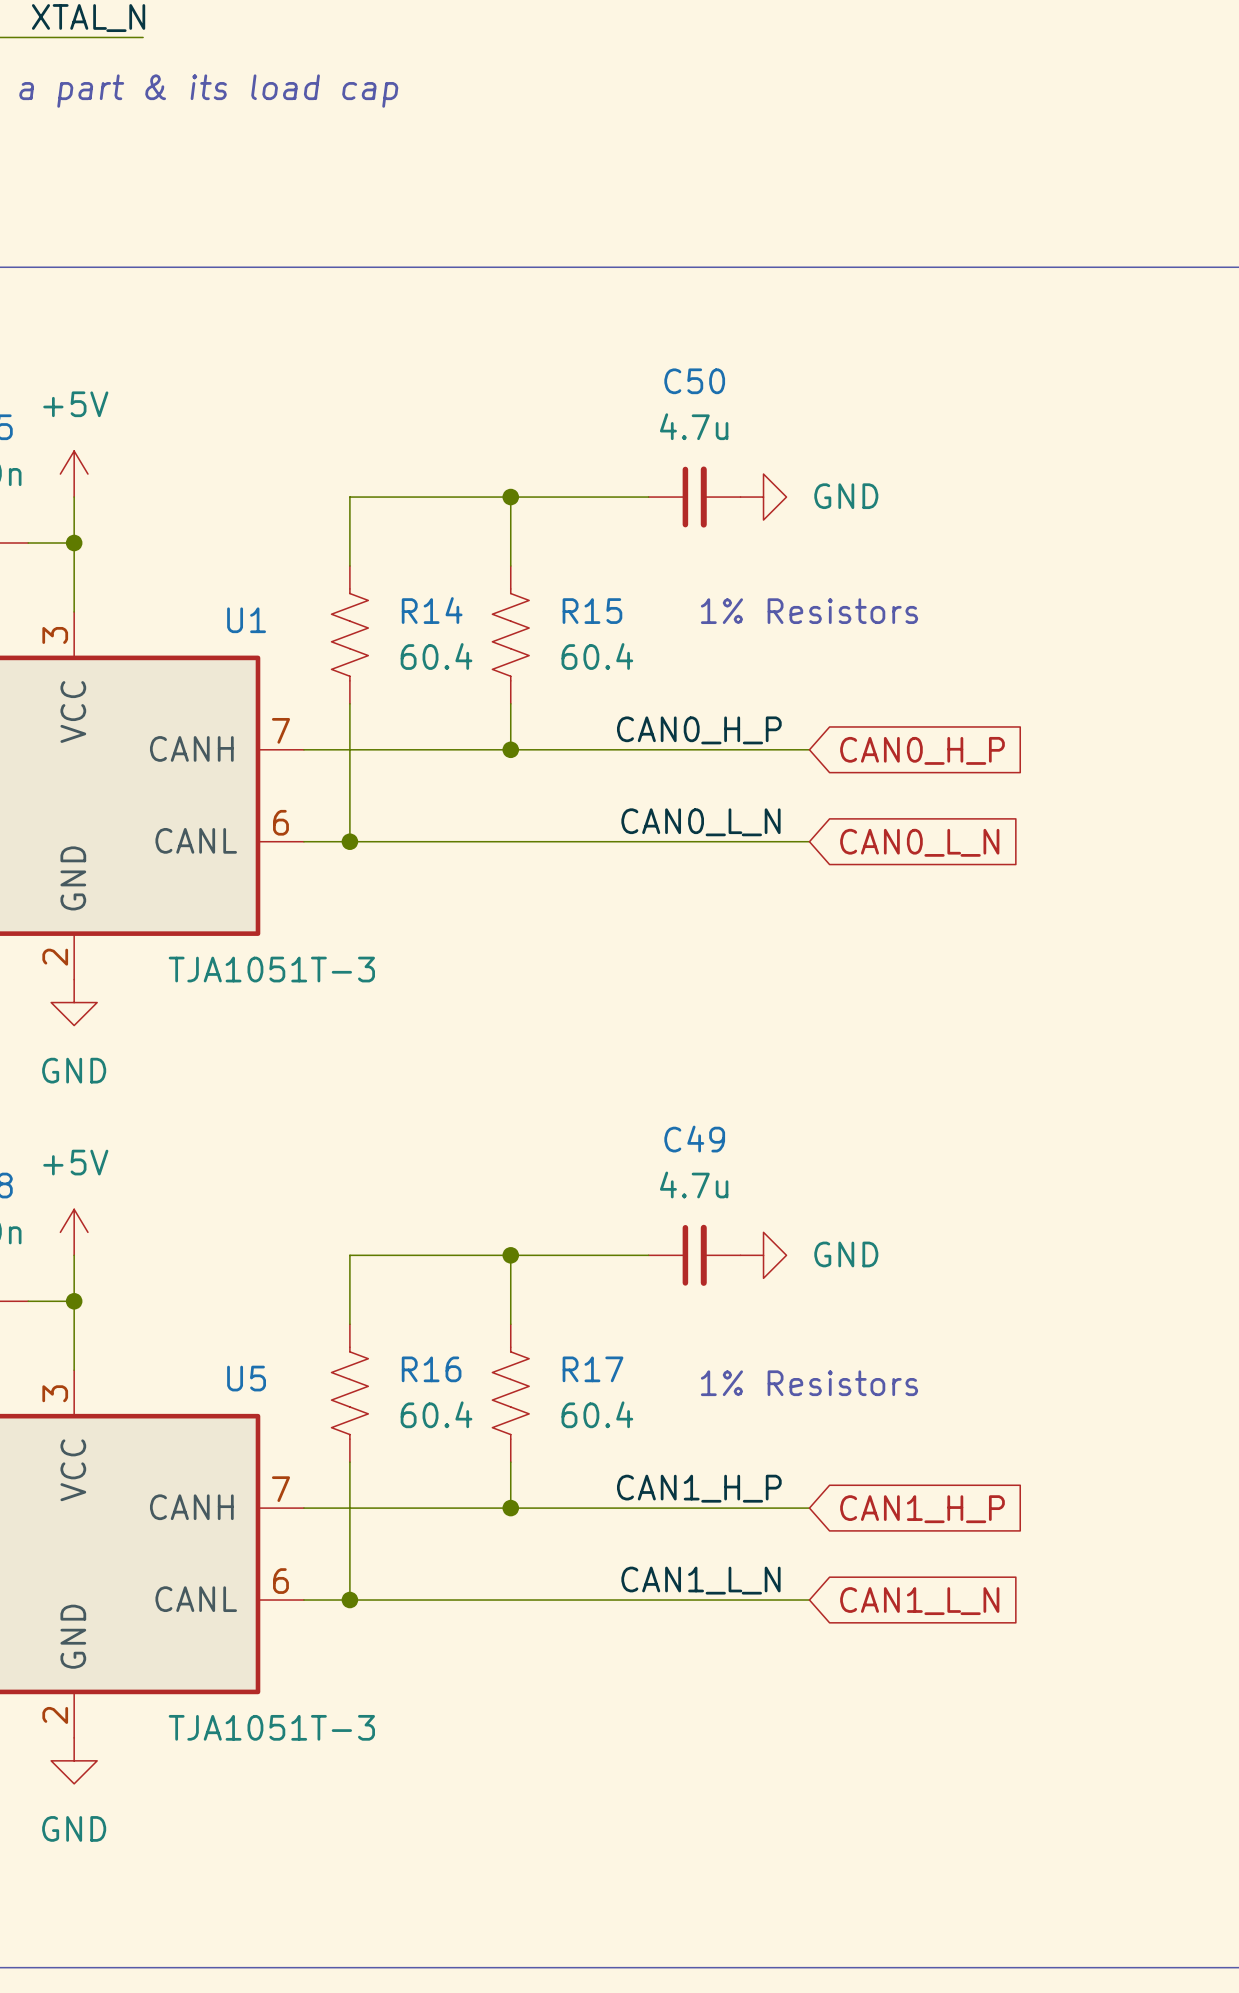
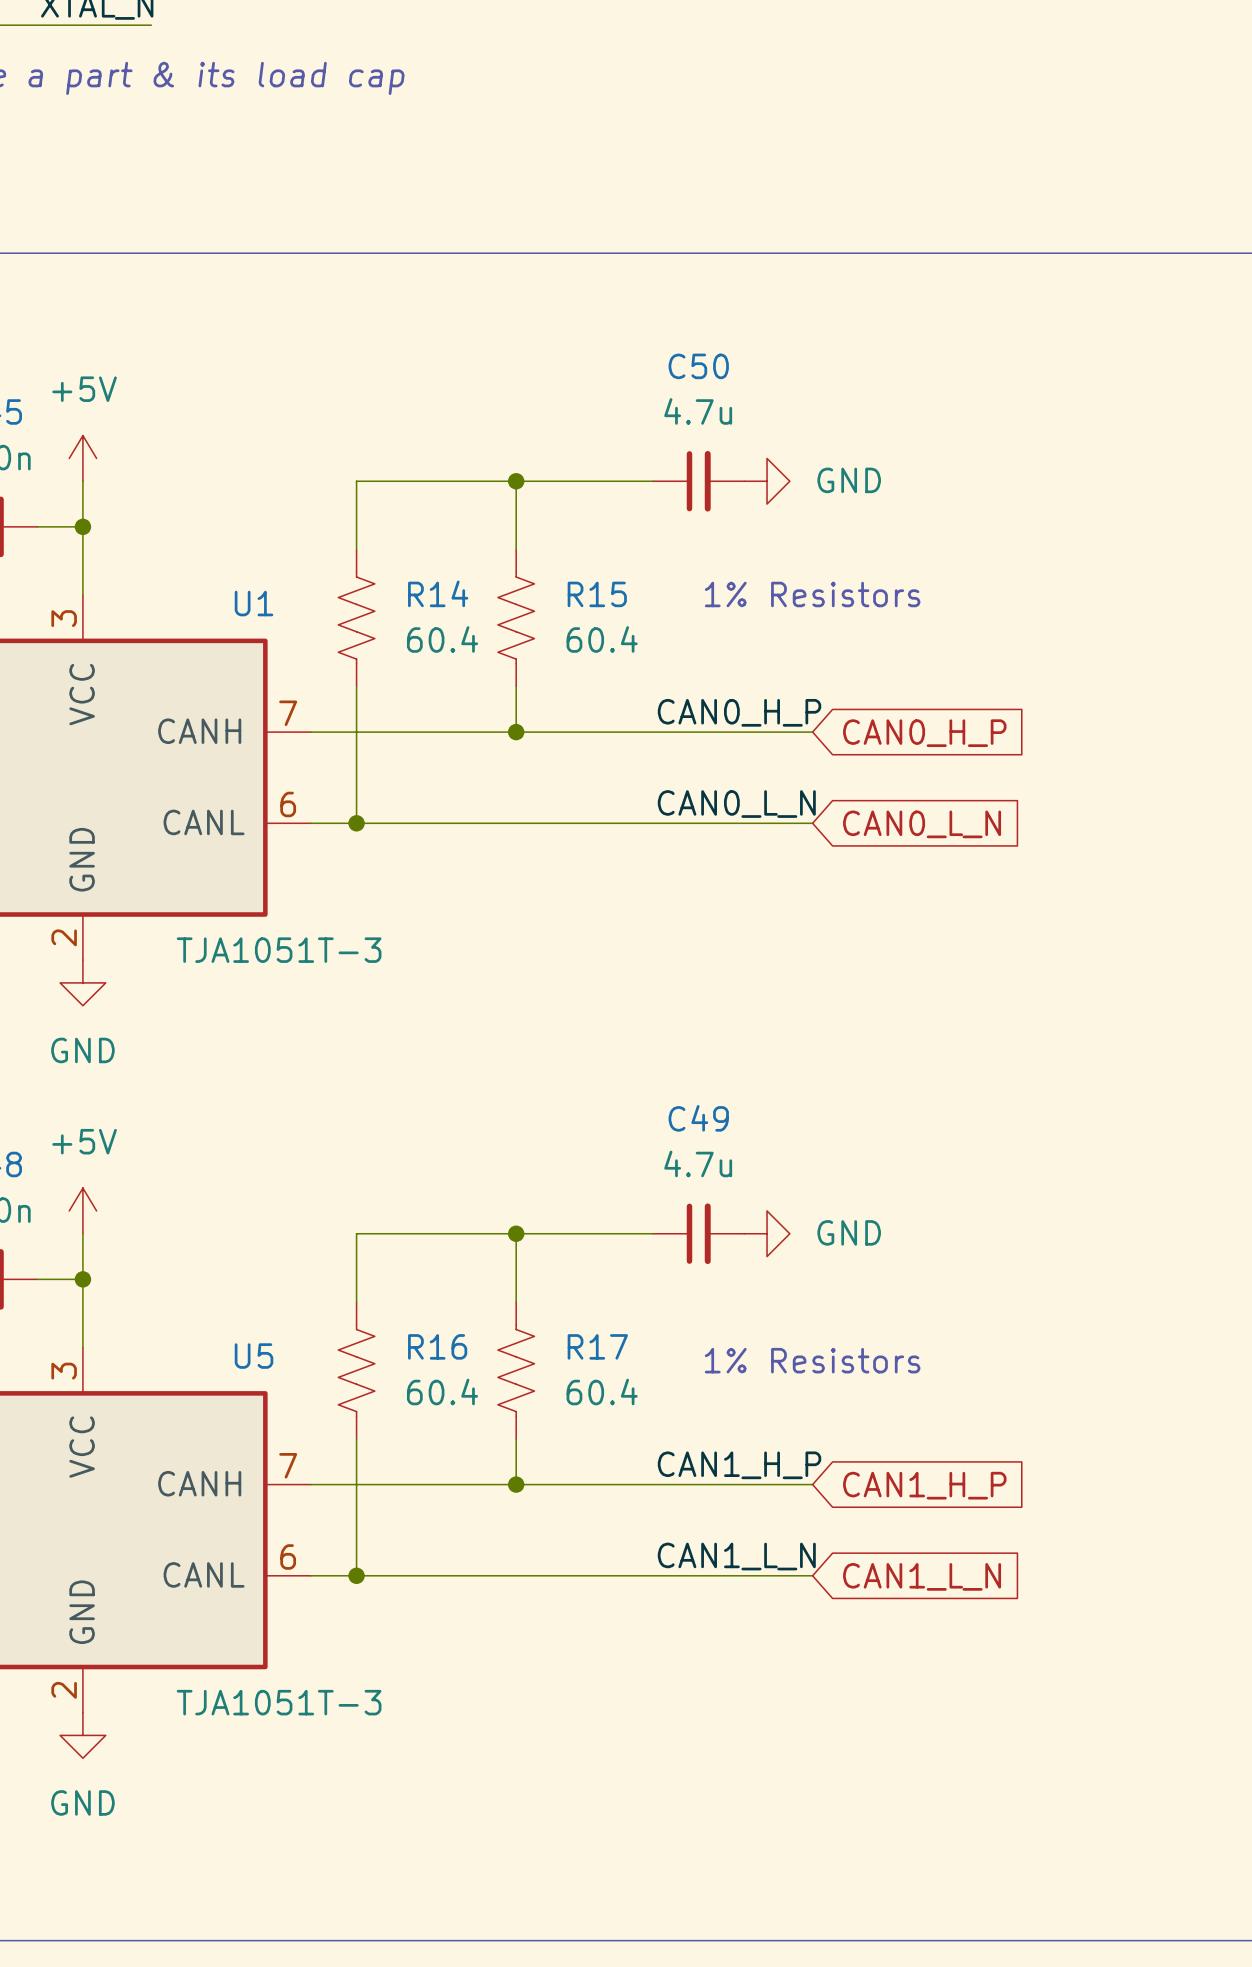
label position: CAN0_H_P (699, 730) -> CAN0_H_P (739, 712)
label position: CAN0_L_N (700, 822) -> CAN0_L_N (736, 804)
label position: CAN1_H_P (699, 1488) -> CAN1_H_P (739, 1465)
label position: CAN1_L_N (700, 1580) -> CAN1_L_N (736, 1556)

